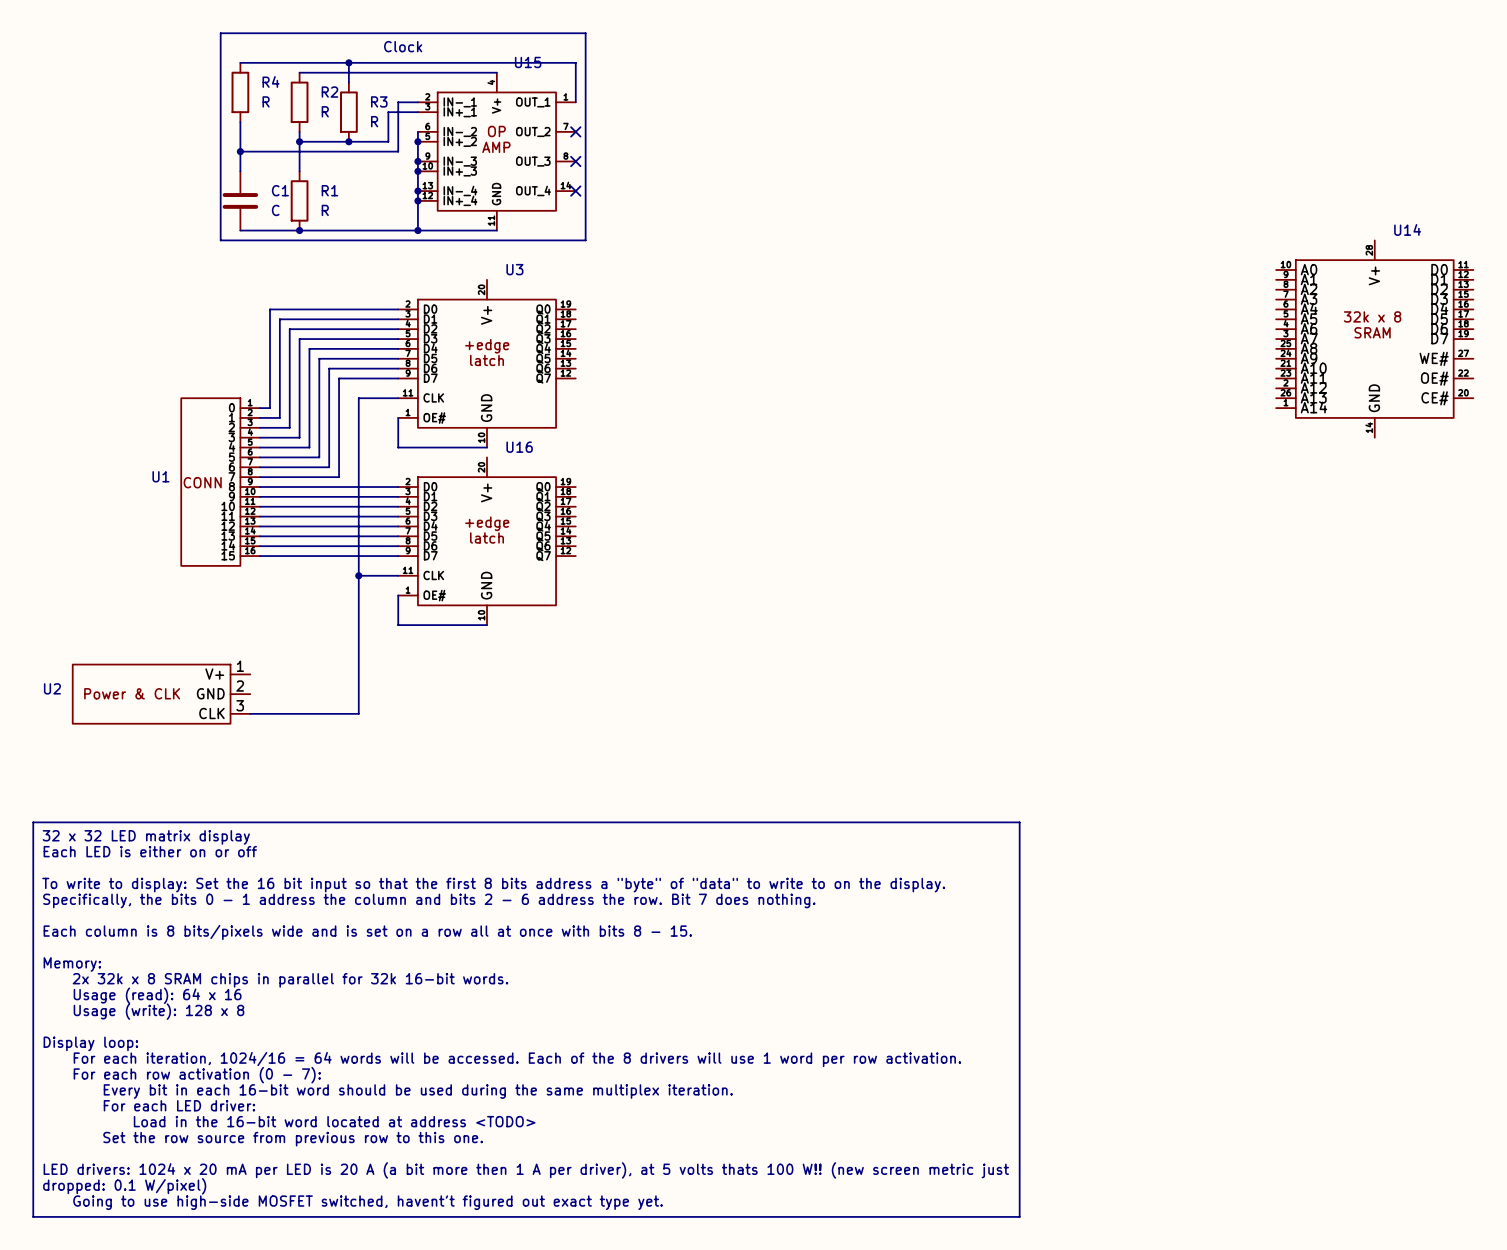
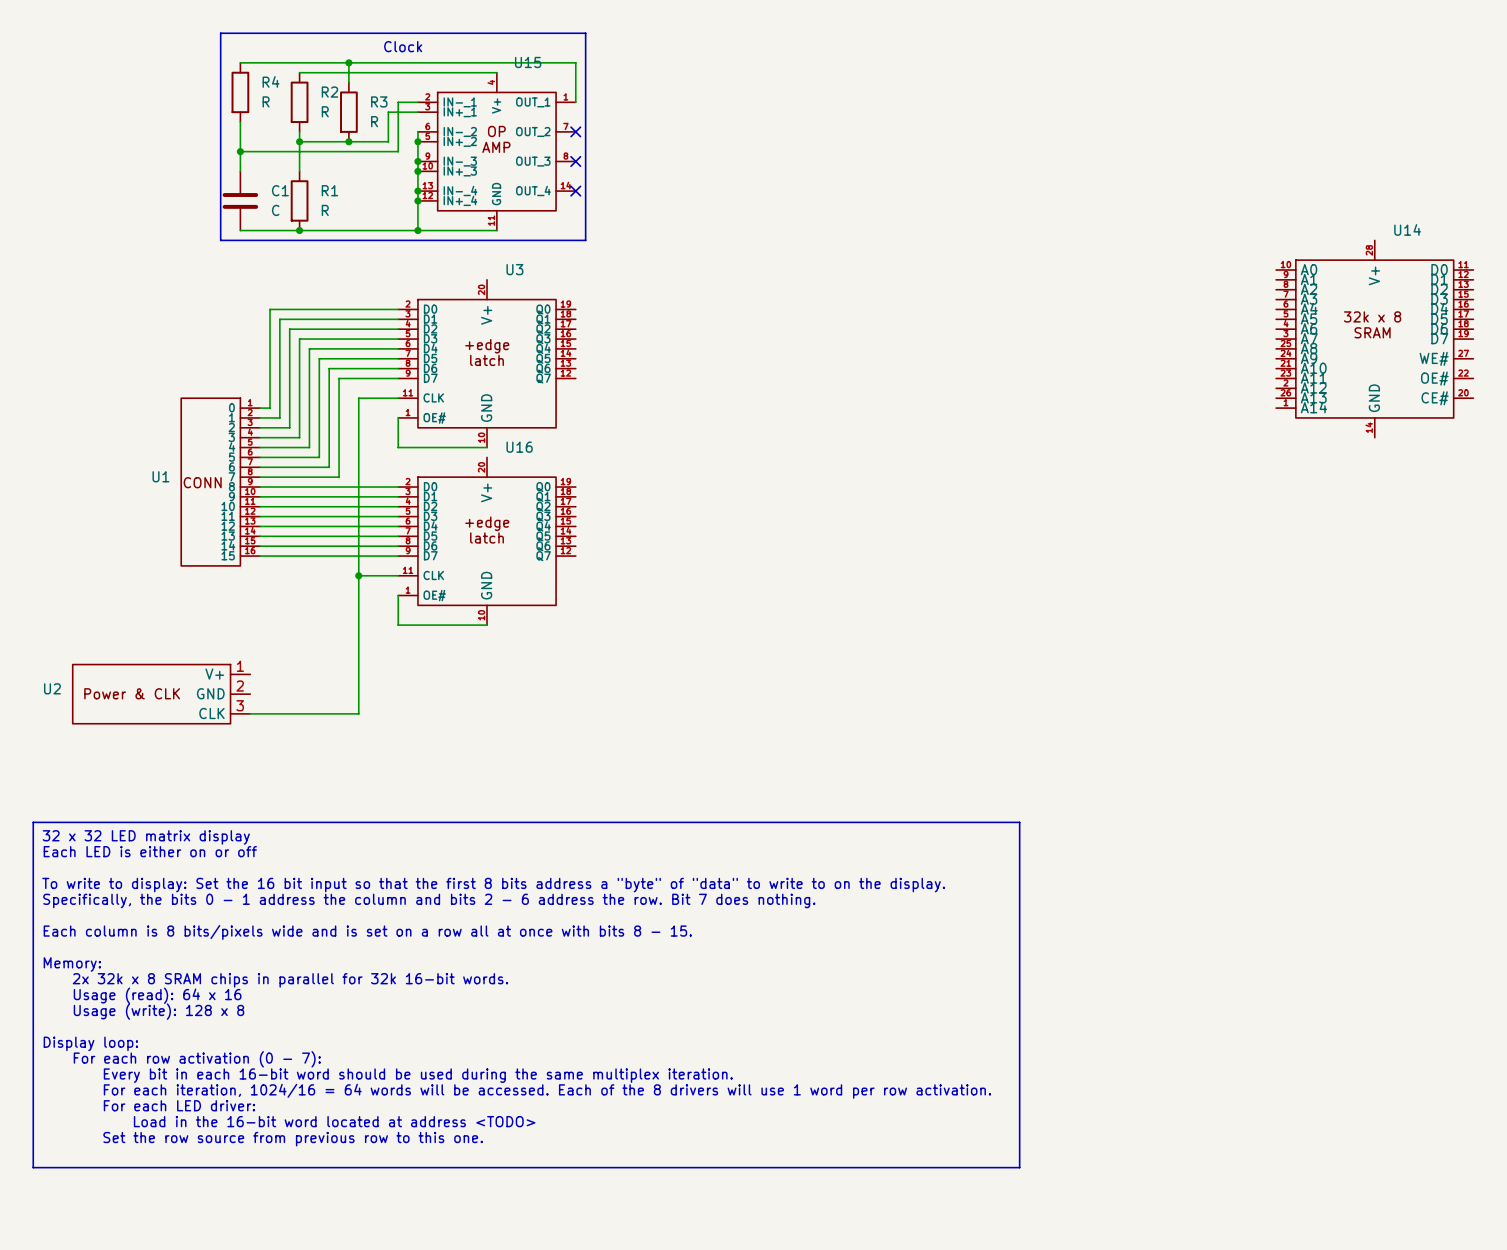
text: For each iteration, 1024/16 = 64 words will be accessed. Each of the 8 drivers will use 1 word per row activation. (517, 1059) -> For each row activation (0 - 7): (197, 1059)
text: For each row activation (0 - 7): (197, 1075) -> Every bit in each 16-bit word should be used during the same multiplex iteration. (418, 1075)
text: Every bit in each 16-bit word should be used during the same multiplex iteration. (418, 1091) -> For each iteration, 1024/16 = 64 words will be accessed. Each of the 8 drivers will use 1 word per row activation. (547, 1091)
line: (33, 1167) (33, 1216) (1019, 1216) (1019, 1167) -> (33, 1167) (1019, 1167)
text: LED drivers: 1024 x 20 mA per LED is 20 A (a bit more then 1 A per driver), at 5 volts thats 100 W!! (new screen metric just (526, 1170) -> none
text: dropped: 0.1 W/pixel) (124, 1186) -> none
text: Going to use high-side MOSFET switched, havent't figured out exact type yet. (368, 1202) -> none

